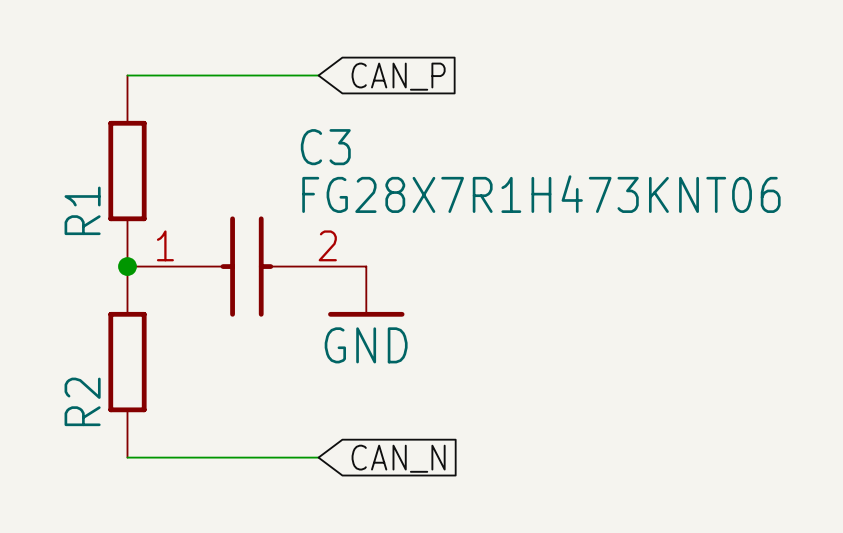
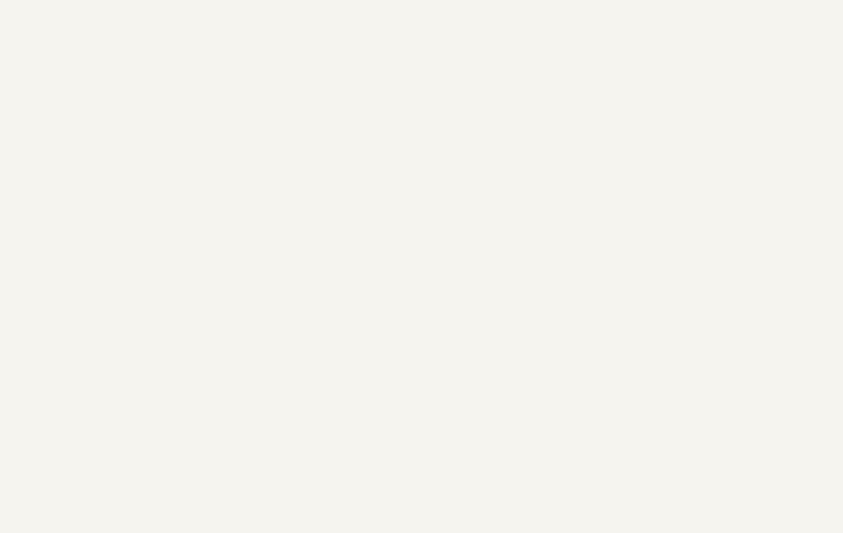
wire: (127, 75) (318, 75) -> none
global label: CAN_P (398, 76) -> none
R1: (127, 171) -> none
junction: (127, 266) -> none
C3: FG28X7R1H473KNT06 (246, 266) -> none
power symbol: GND (366, 291) -> none
R2: (127, 362) -> none
wire: (127, 457) (318, 457) -> none
global label: CAN_N (398, 458) -> none

